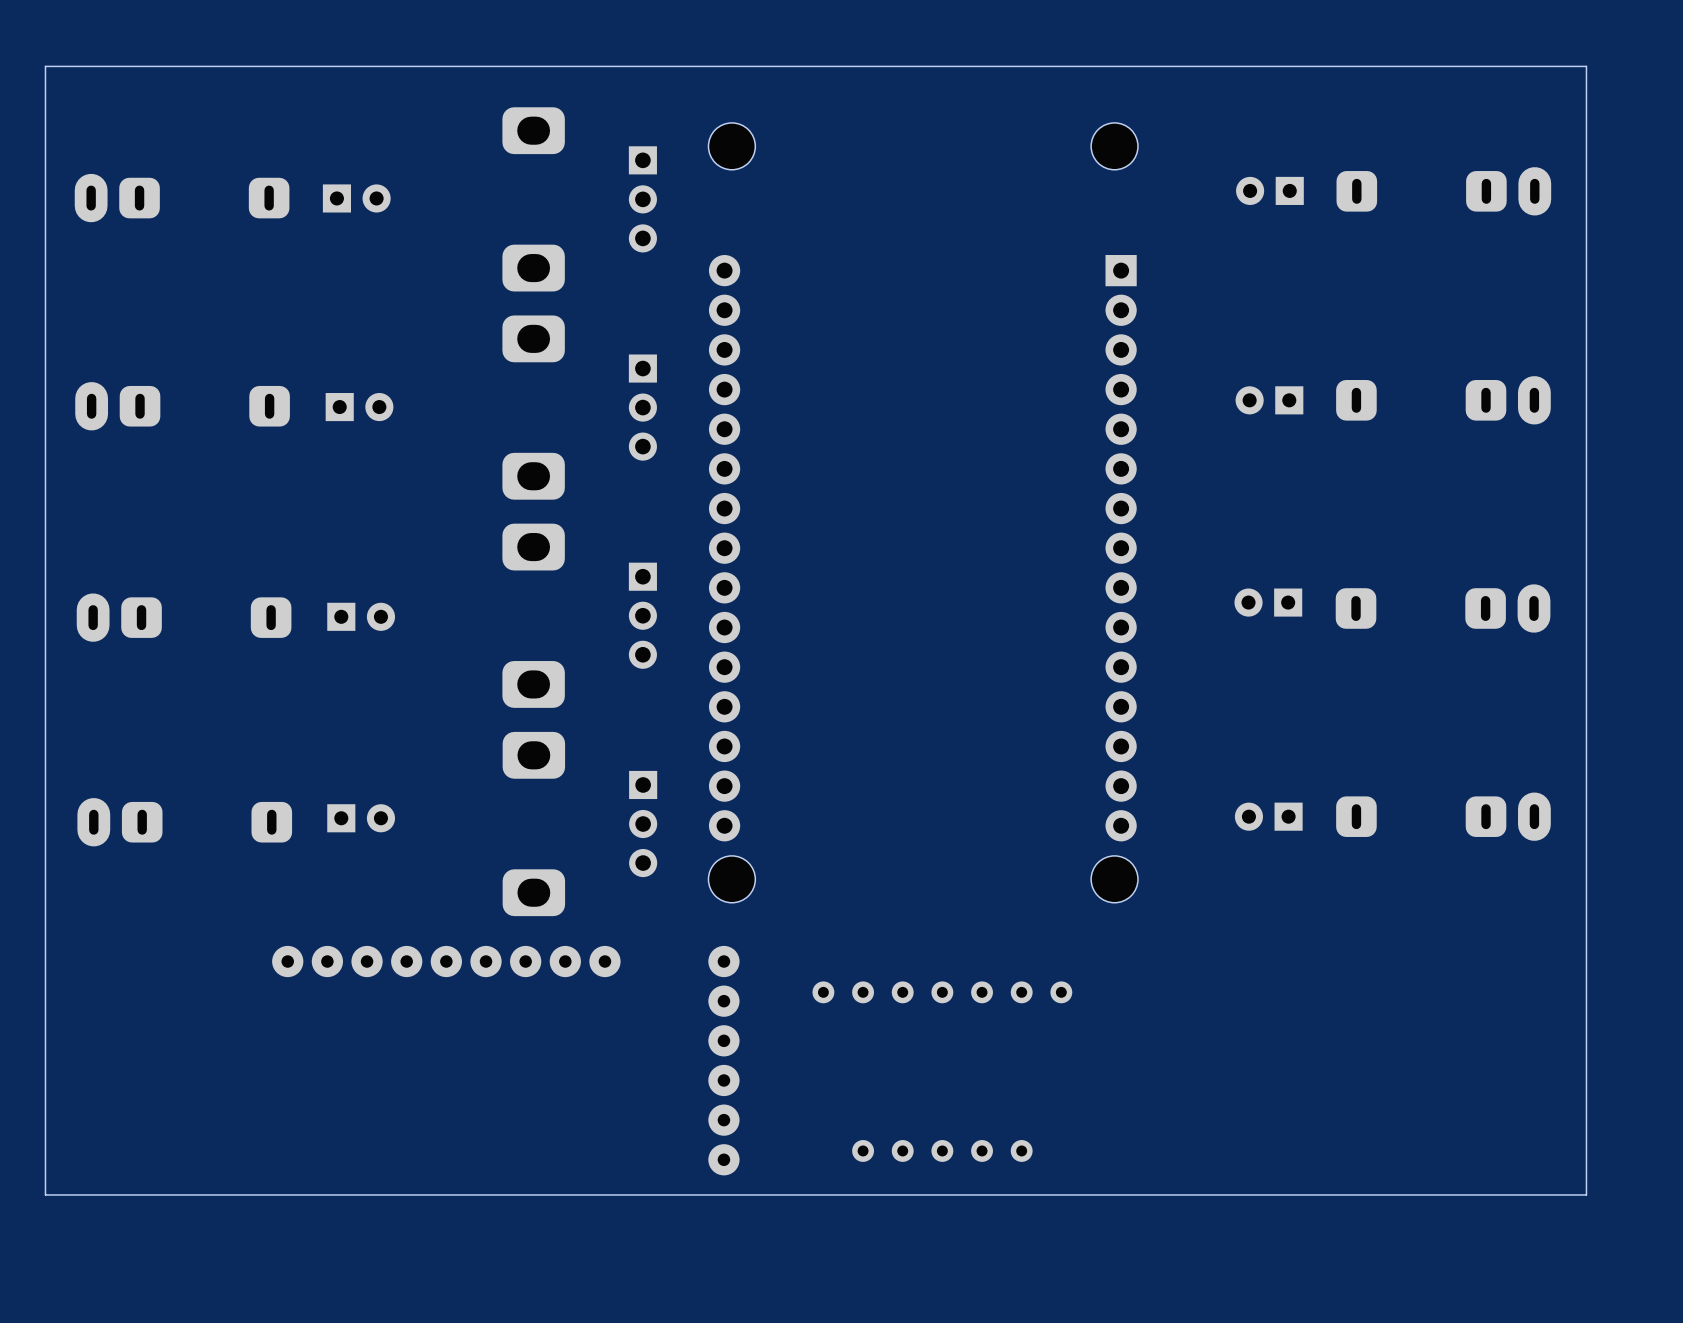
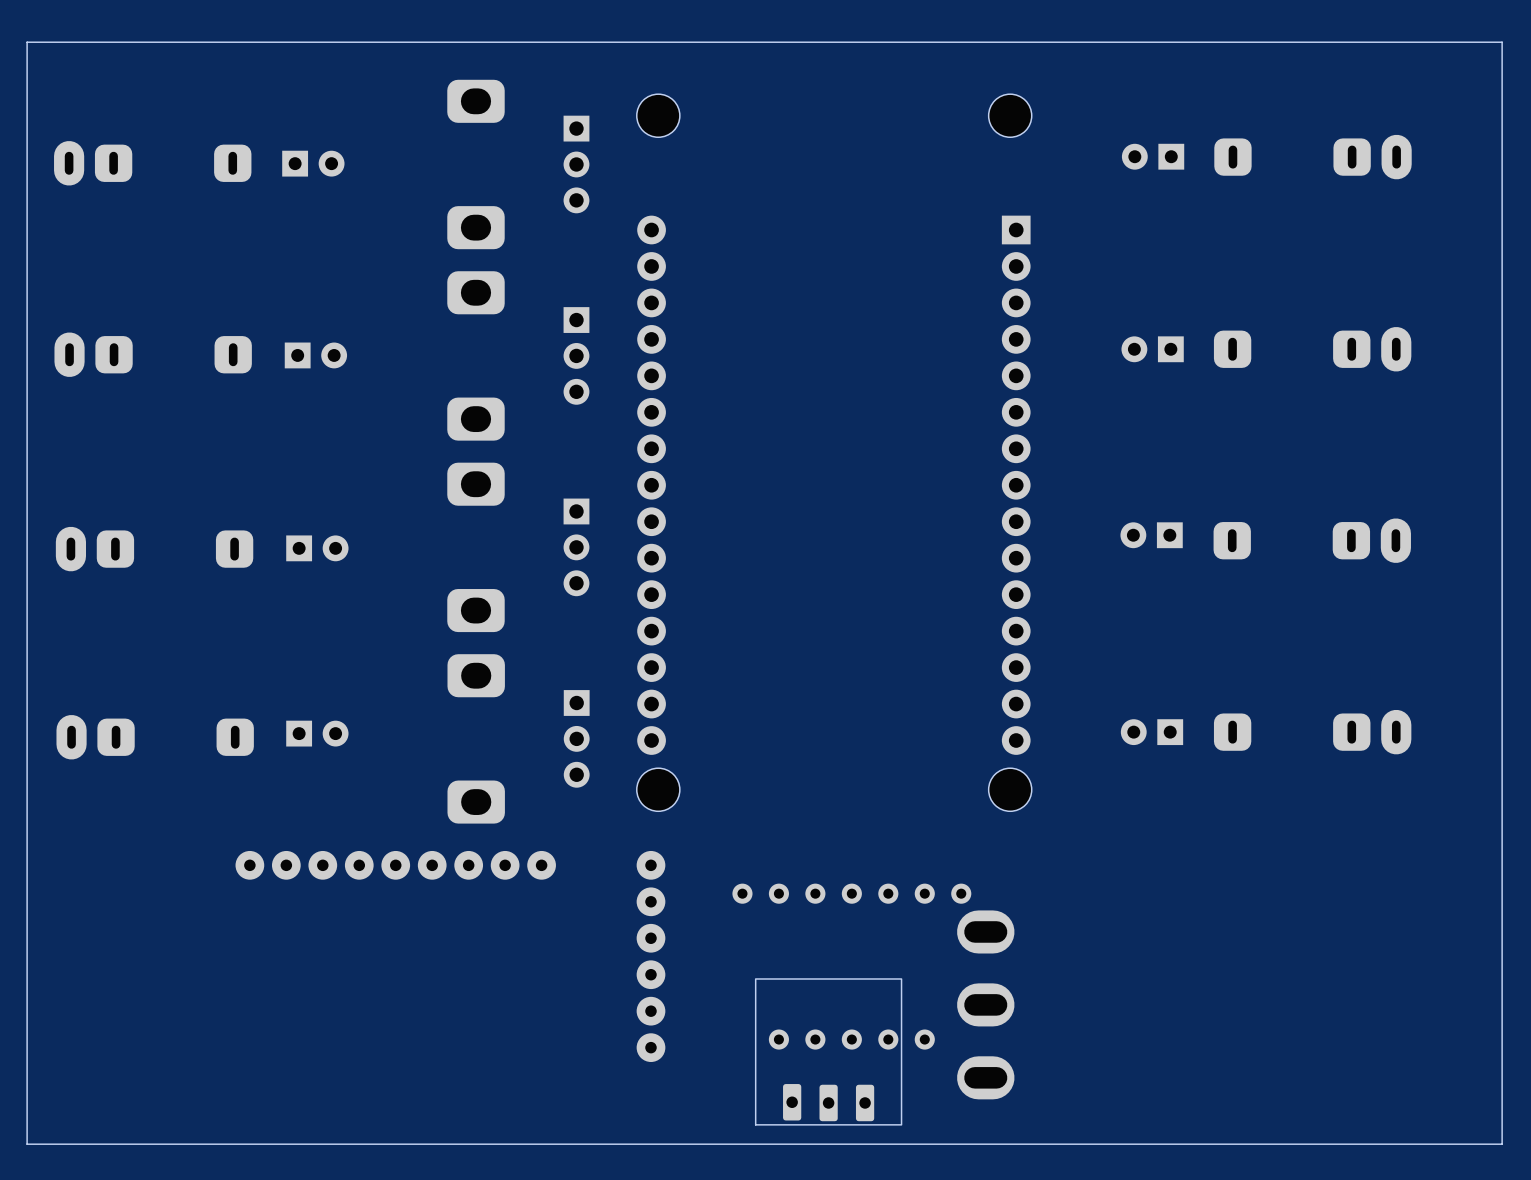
board edge: (1586, 66) (1586, 1194) (45, 1194) -> (1444, 42) (1502, 42) (1502, 1144) (27, 1144) (27, 1080)
part: none -> (985, 1004)
part: none -> (828, 1051)

